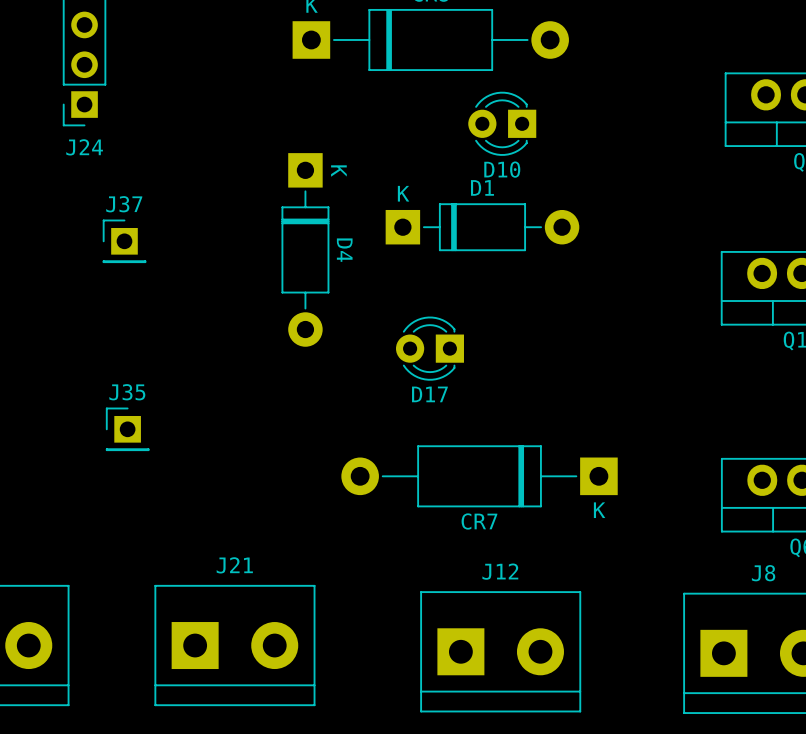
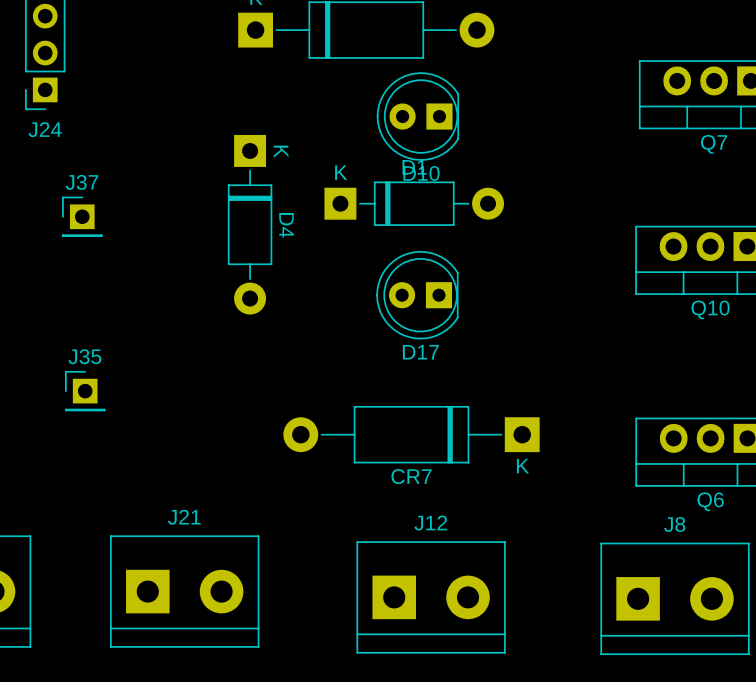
D10 footprint: [468, 91, 537, 156] -> [376, 72, 460, 161]
D17 footprint: [395, 316, 464, 381] -> [376, 250, 459, 340]

